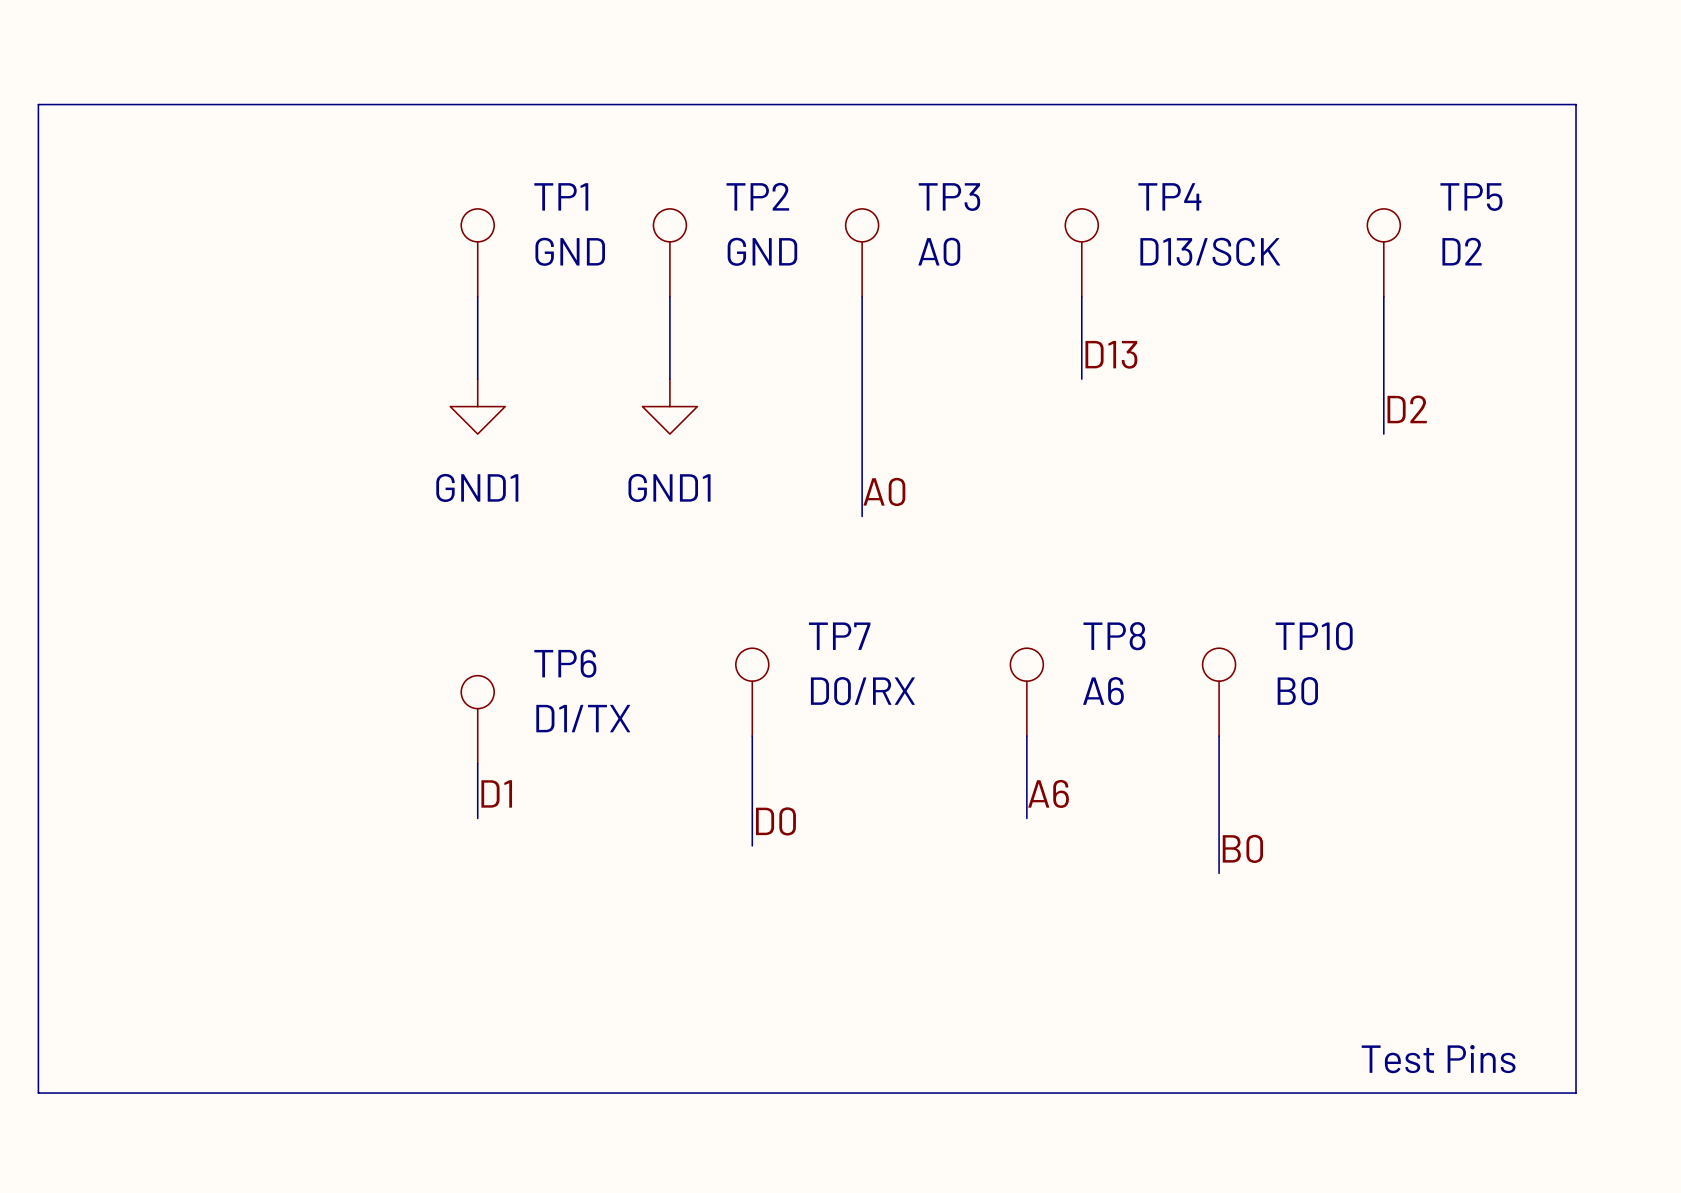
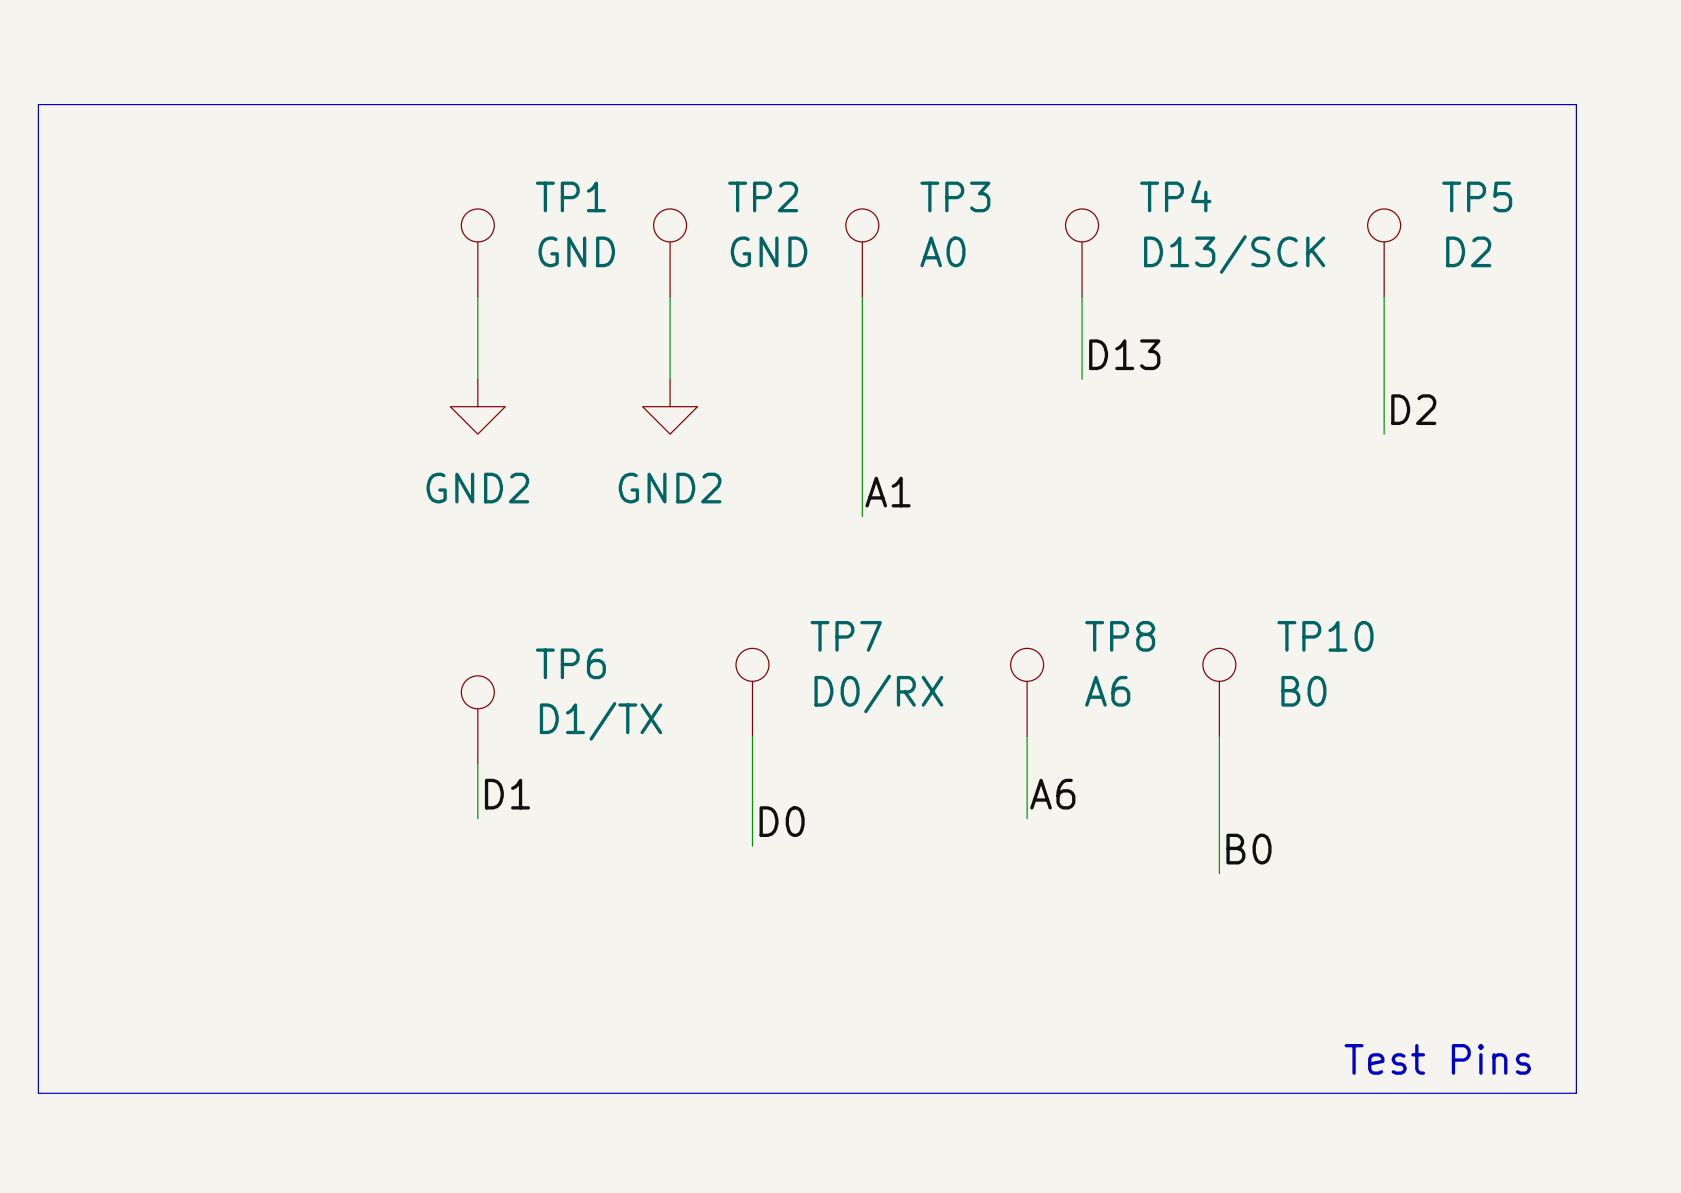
power symbol: GND1 (477, 406) -> GND2 (477, 406)
power symbol: GND1 (669, 406) -> GND2 (670, 406)
label: A0 (884, 491) -> A1 (888, 492)

